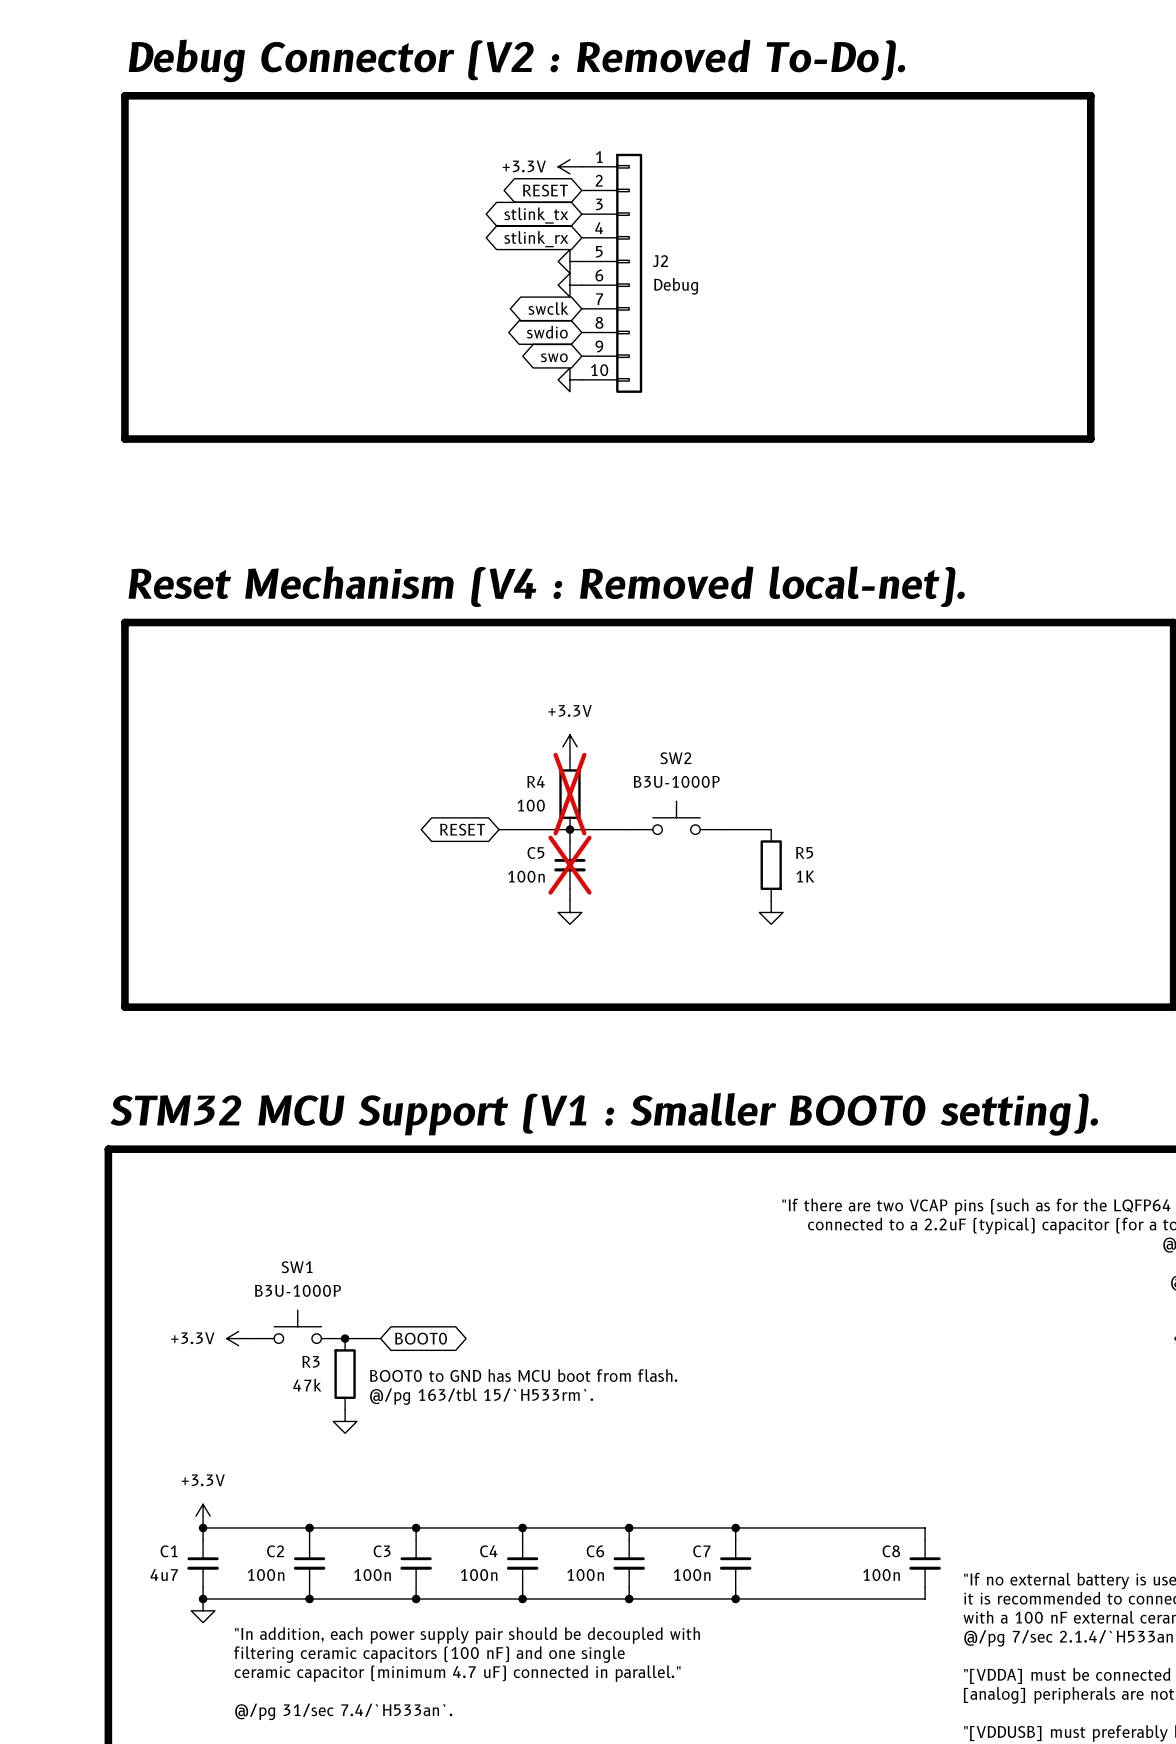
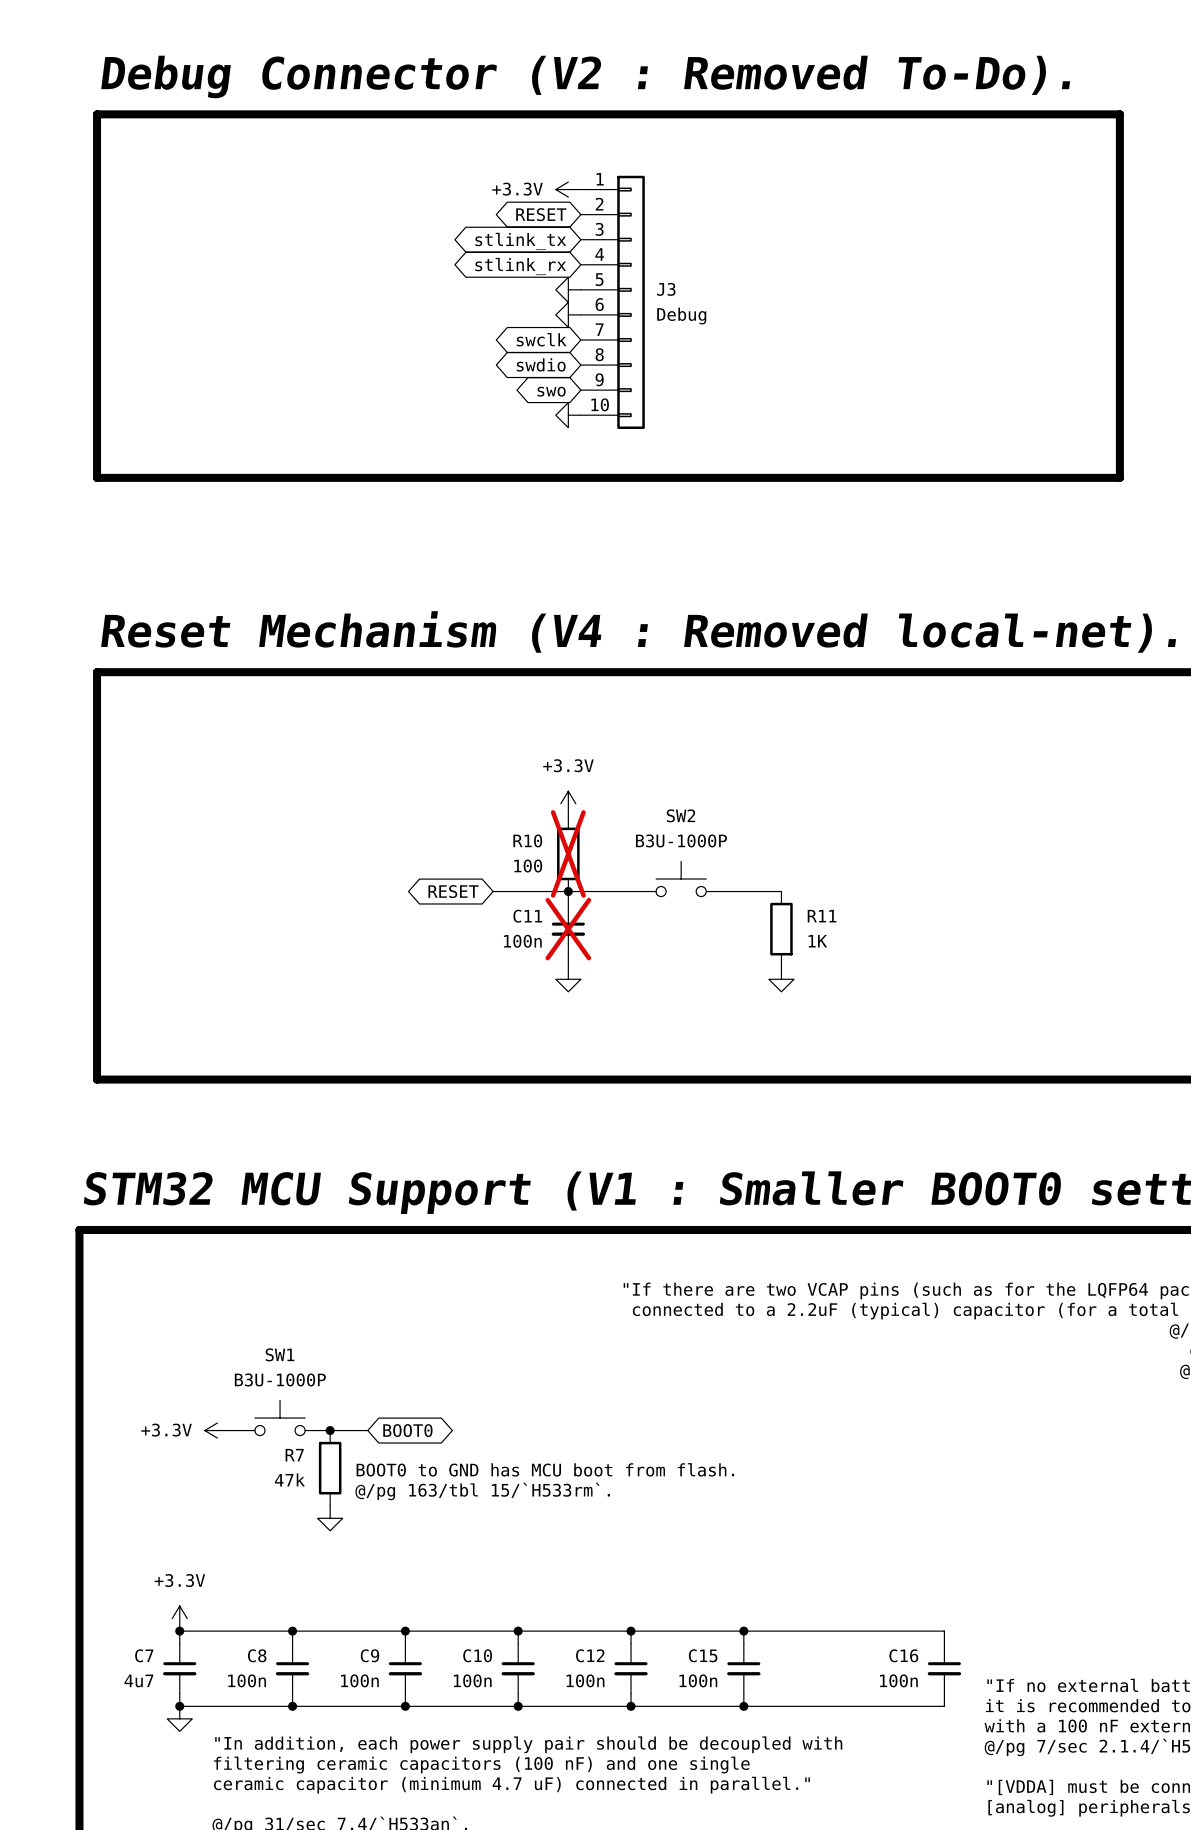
J2 name: J2 (660, 261) -> J3 (666, 289)
R4 name: R4 (536, 781) -> R10 (527, 840)
R5 name: R5 (804, 852) -> R11 (822, 916)
C5 name: C5 (535, 853) -> C11 (527, 916)
R3 name: R3 (310, 1361) -> R7 (294, 1455)
C1 name: C1 (169, 1551) -> C7 (144, 1655)
C2 name: C2 (275, 1551) -> C8 (257, 1655)
C3 name: C3 (382, 1551) -> C9 (369, 1655)
C4 name: C4 (488, 1551) -> C10 (477, 1655)
C6 name: C6 (595, 1551) -> C12 (590, 1655)
C7 name: C7 (701, 1551) -> C15 (703, 1655)
C8 name: C8 (891, 1551) -> C16 (903, 1655)

